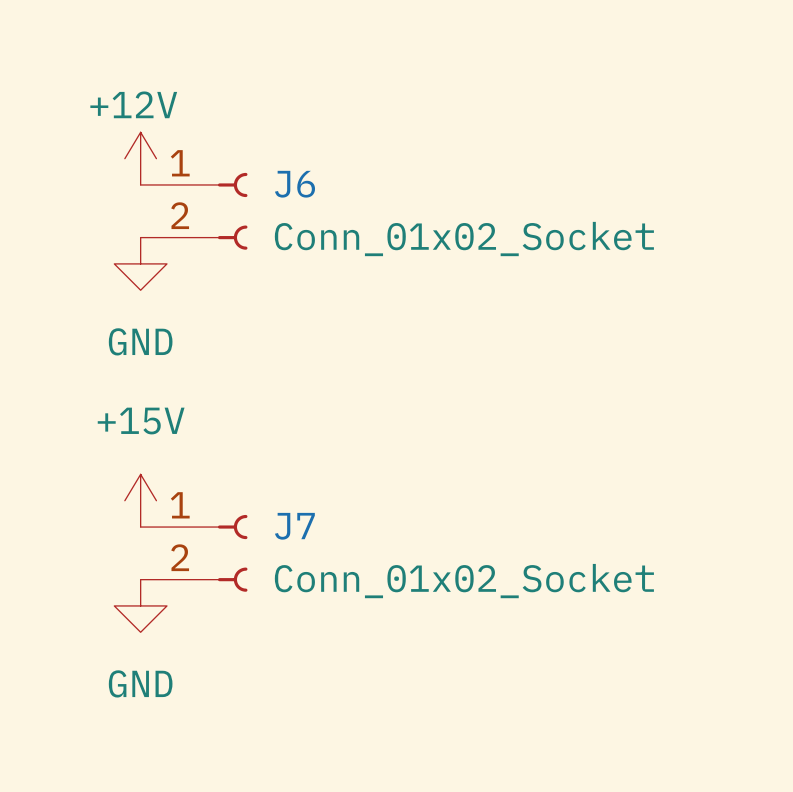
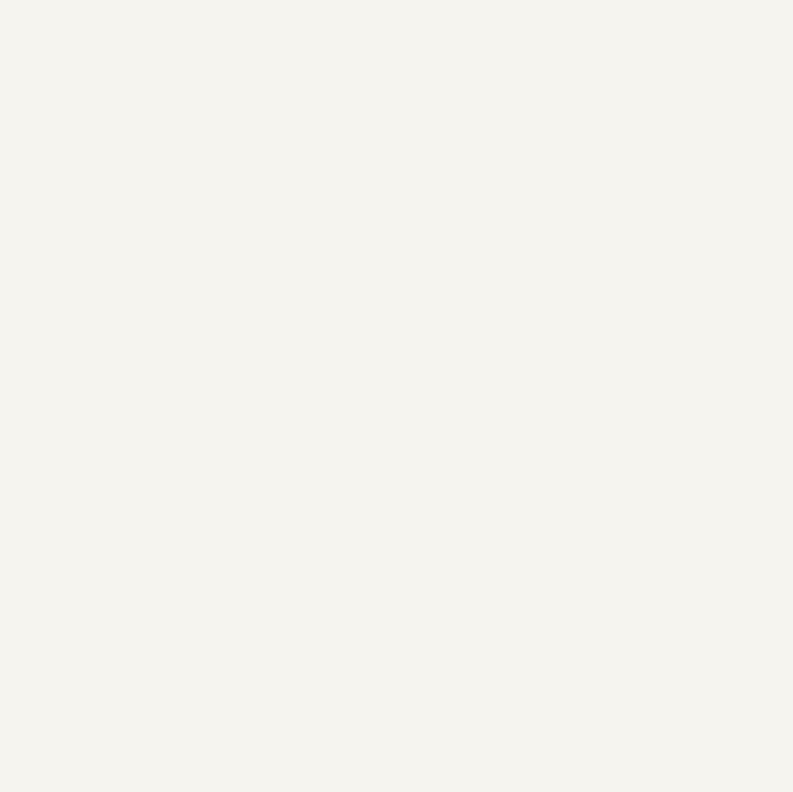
power symbol: +12V (140, 158) -> none
J6: Conn_01x02_Socket (194, 211) -> none
power symbol: GND (140, 263) -> none
power symbol: +15V (140, 500) -> none
J7: Conn_01x02_Socket (194, 553) -> none
power symbol: GND (140, 605) -> none

